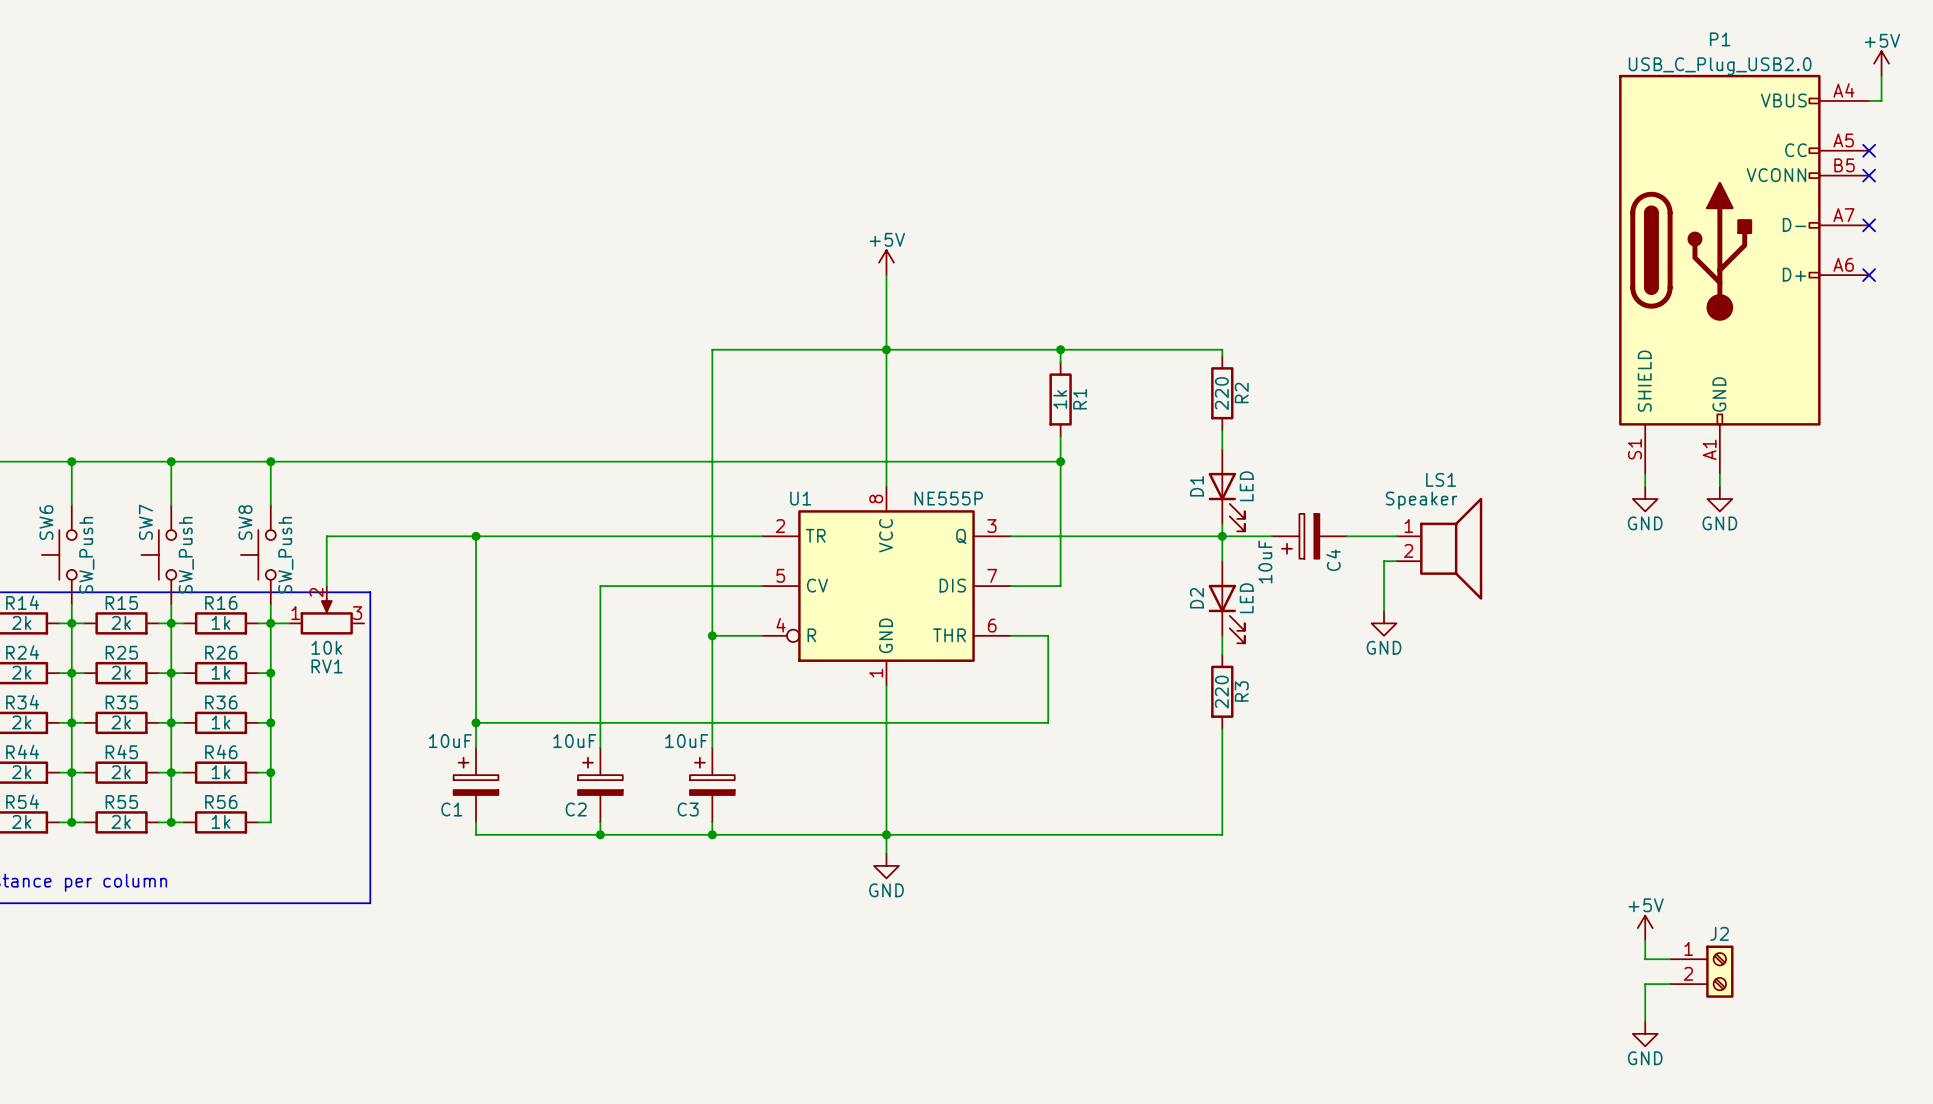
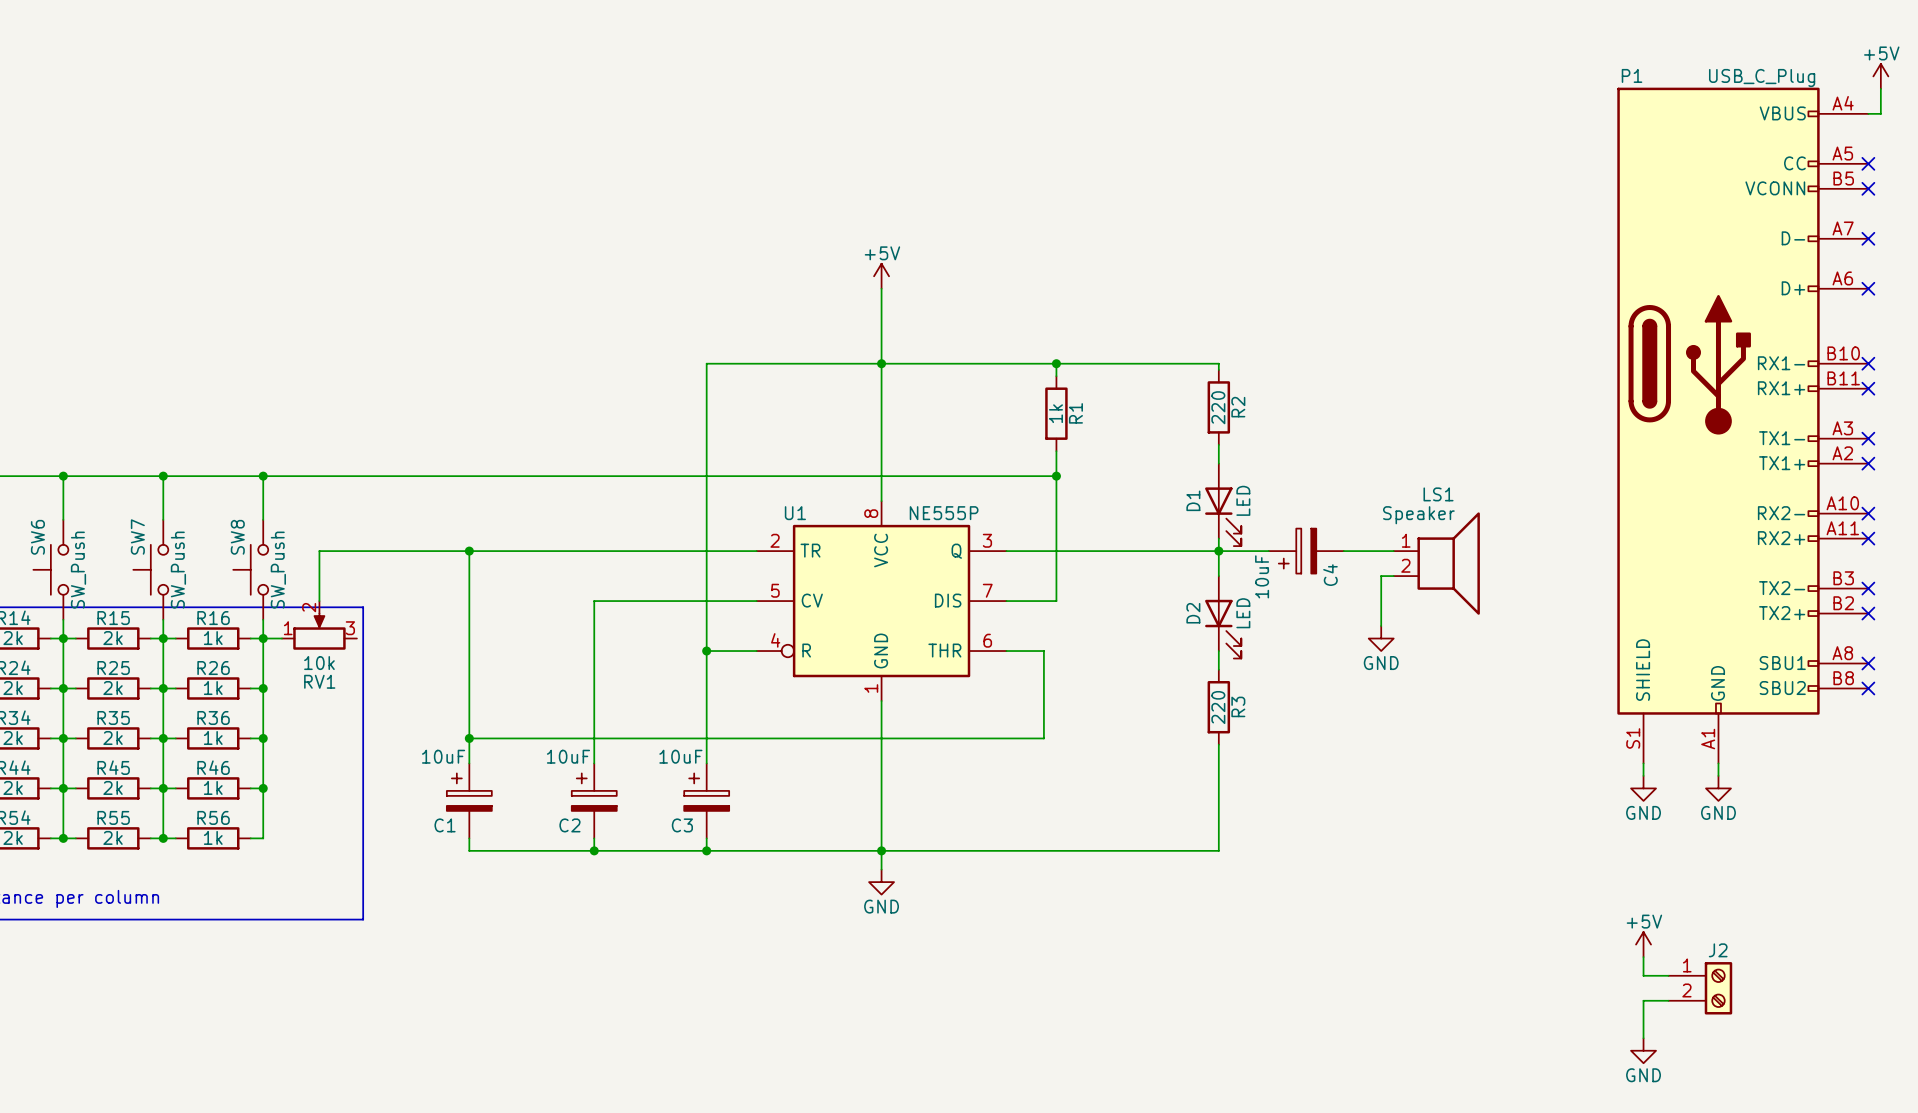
P1 name position: P1 (1720, 39) -> P1 (1632, 75)
P1 value: USB_C_Plug_USB2.0 (1720, 66) -> USB_C_Plug (1762, 78)
P1 symbol: [1619, 74, 1870, 475] -> [1617, 87, 1869, 764]
no-connect mark: none -> (1868, 363)
no-connect mark: none -> (1868, 388)
no-connect mark: none -> (1868, 438)
no-connect mark: none -> (1868, 463)
power symbol: GND (1645, 499) -> none
power symbol: GND (1719, 499) -> none
no-connect mark: none -> (1868, 513)
no-connect mark: none -> (1868, 538)
no-connect mark: none -> (1868, 588)
no-connect mark: none -> (1868, 613)
no-connect mark: none -> (1868, 663)
no-connect mark: none -> (1868, 688)
wire: none -> (1643, 763) (1643, 775)
wire: none -> (1718, 763) (1718, 775)
power symbol: none -> GND (1643, 788)
power symbol: none -> GND (1718, 788)

